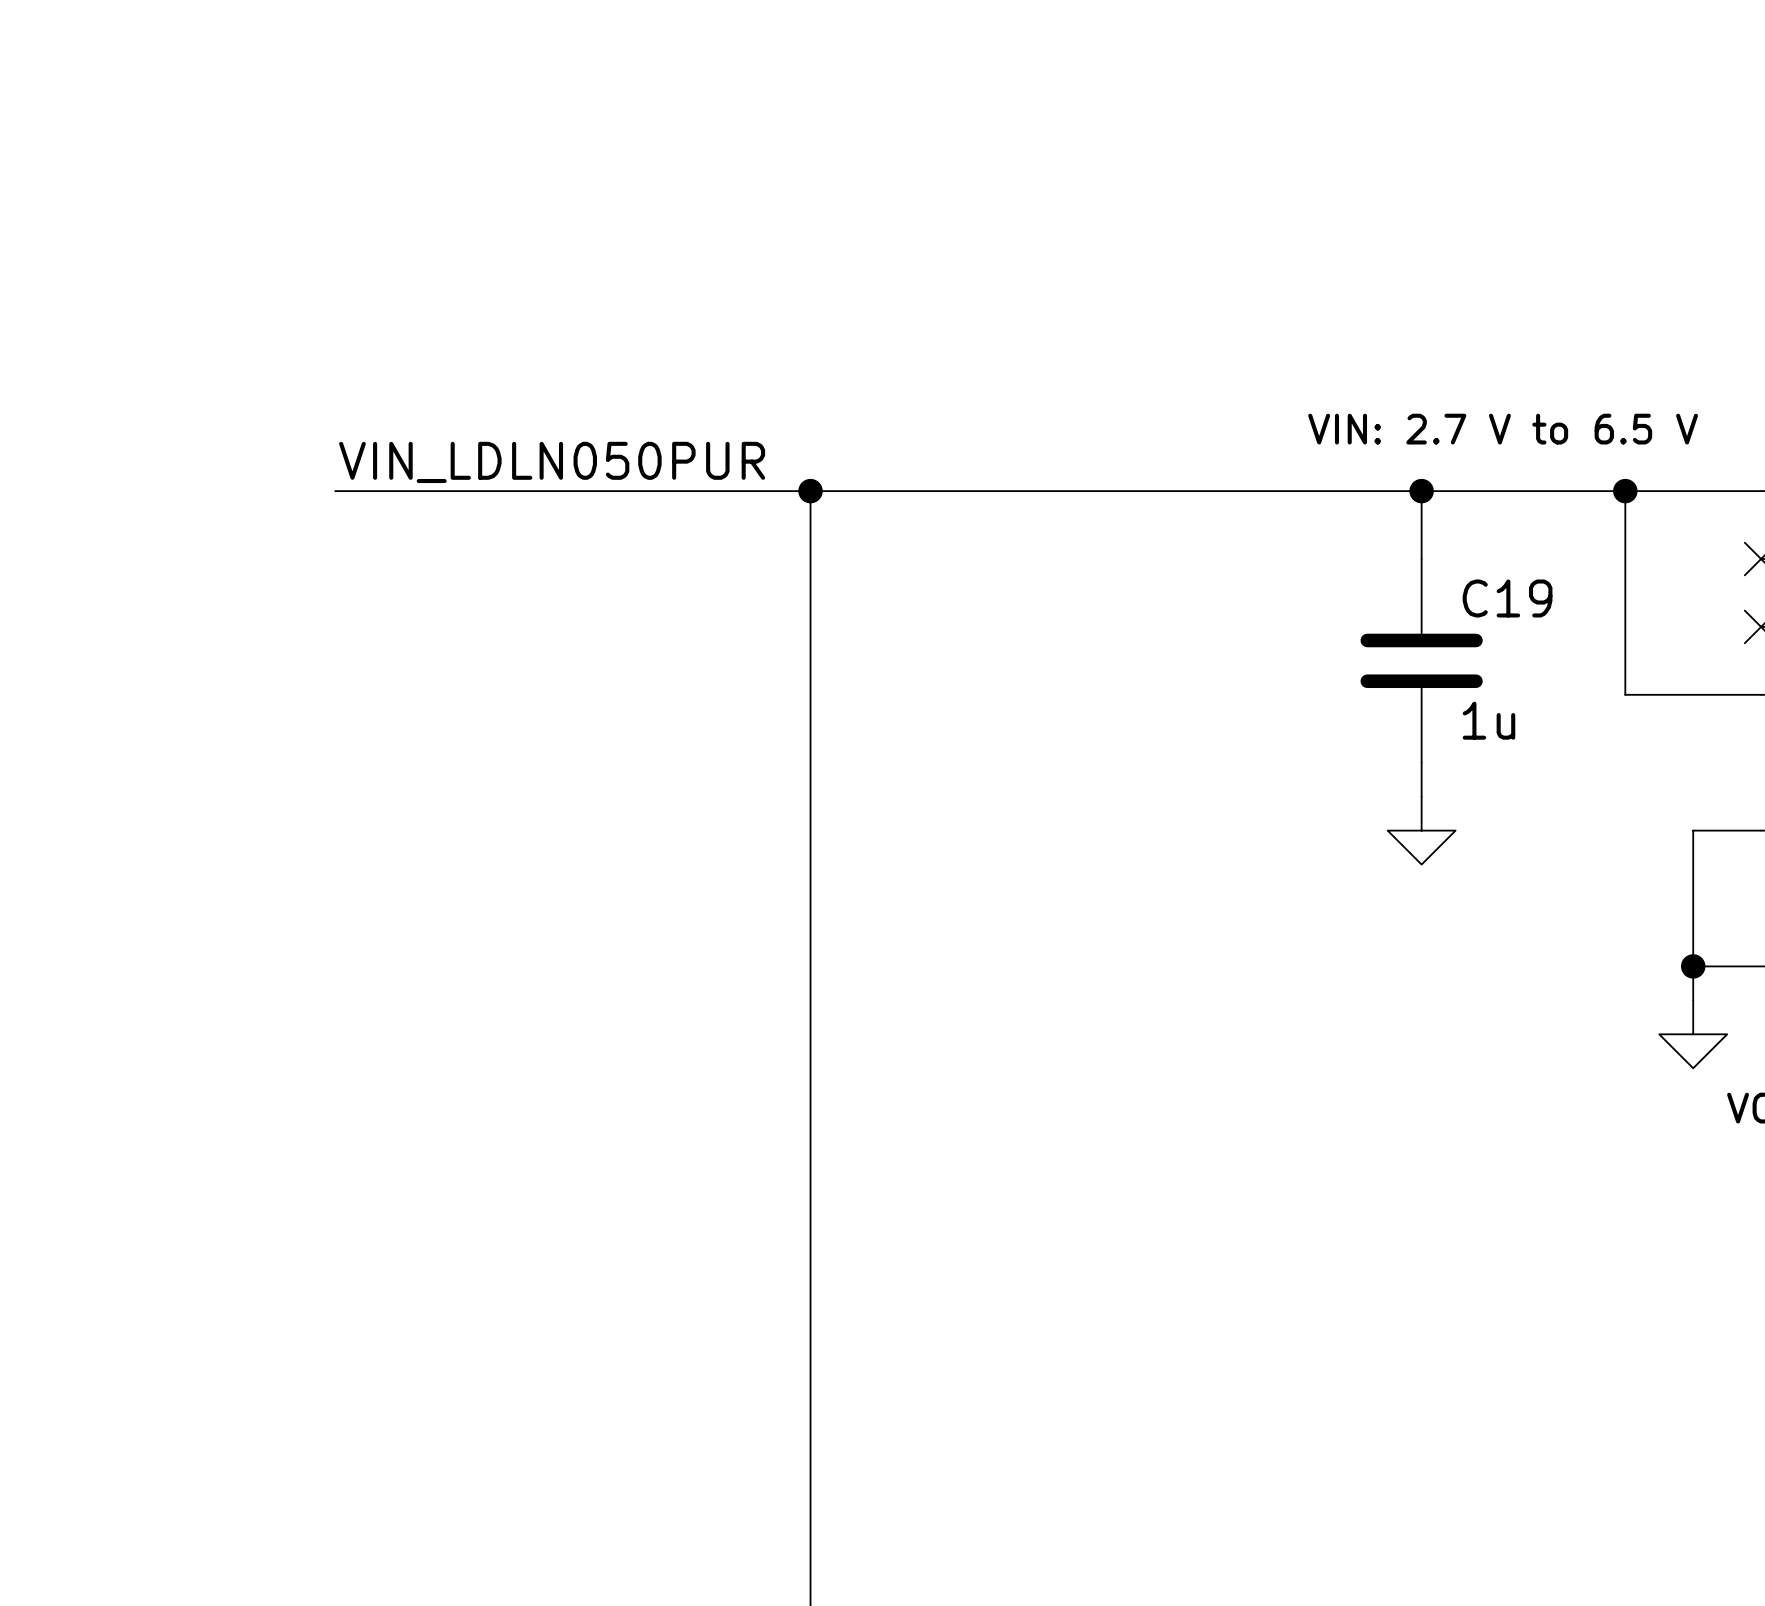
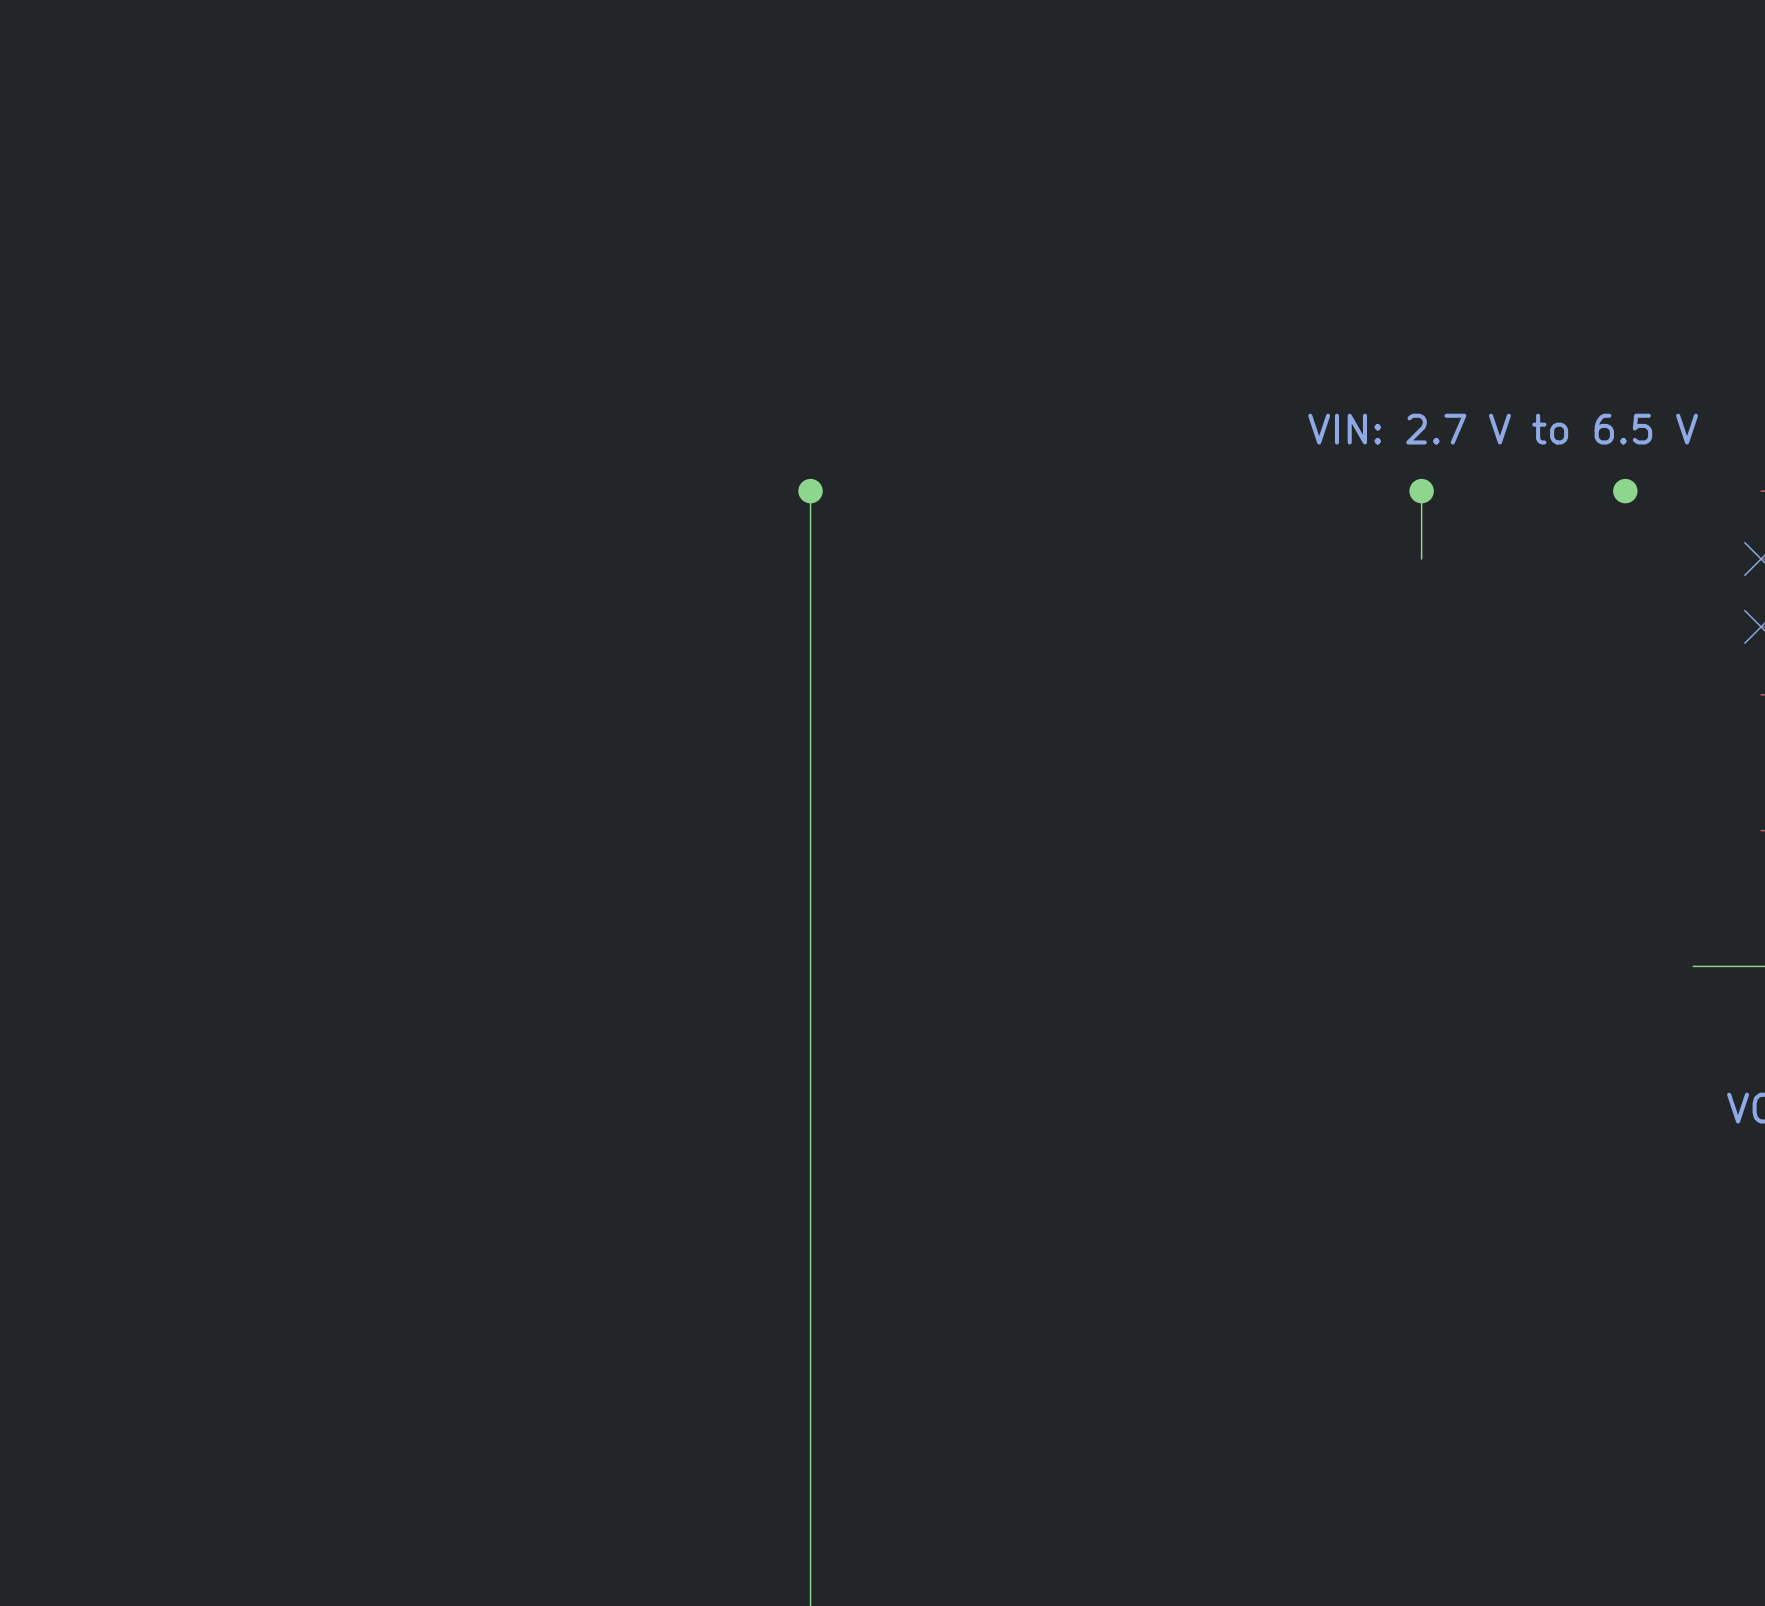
label: VIN_LDLN050PUR (552, 462) -> none
wire: (335, 491) (1761, 491) -> none
wire: (1625, 491) (1625, 694) (1761, 694) -> none
C19: 1u (1421, 660) -> none
wire: (1421, 762) (1421, 796) -> none
power symbol: (1421, 830) -> none
wire: (1761, 830) (1693, 830) (1693, 1000) -> none
junction: (1693, 966) -> none
power symbol: (1693, 1034) -> none

